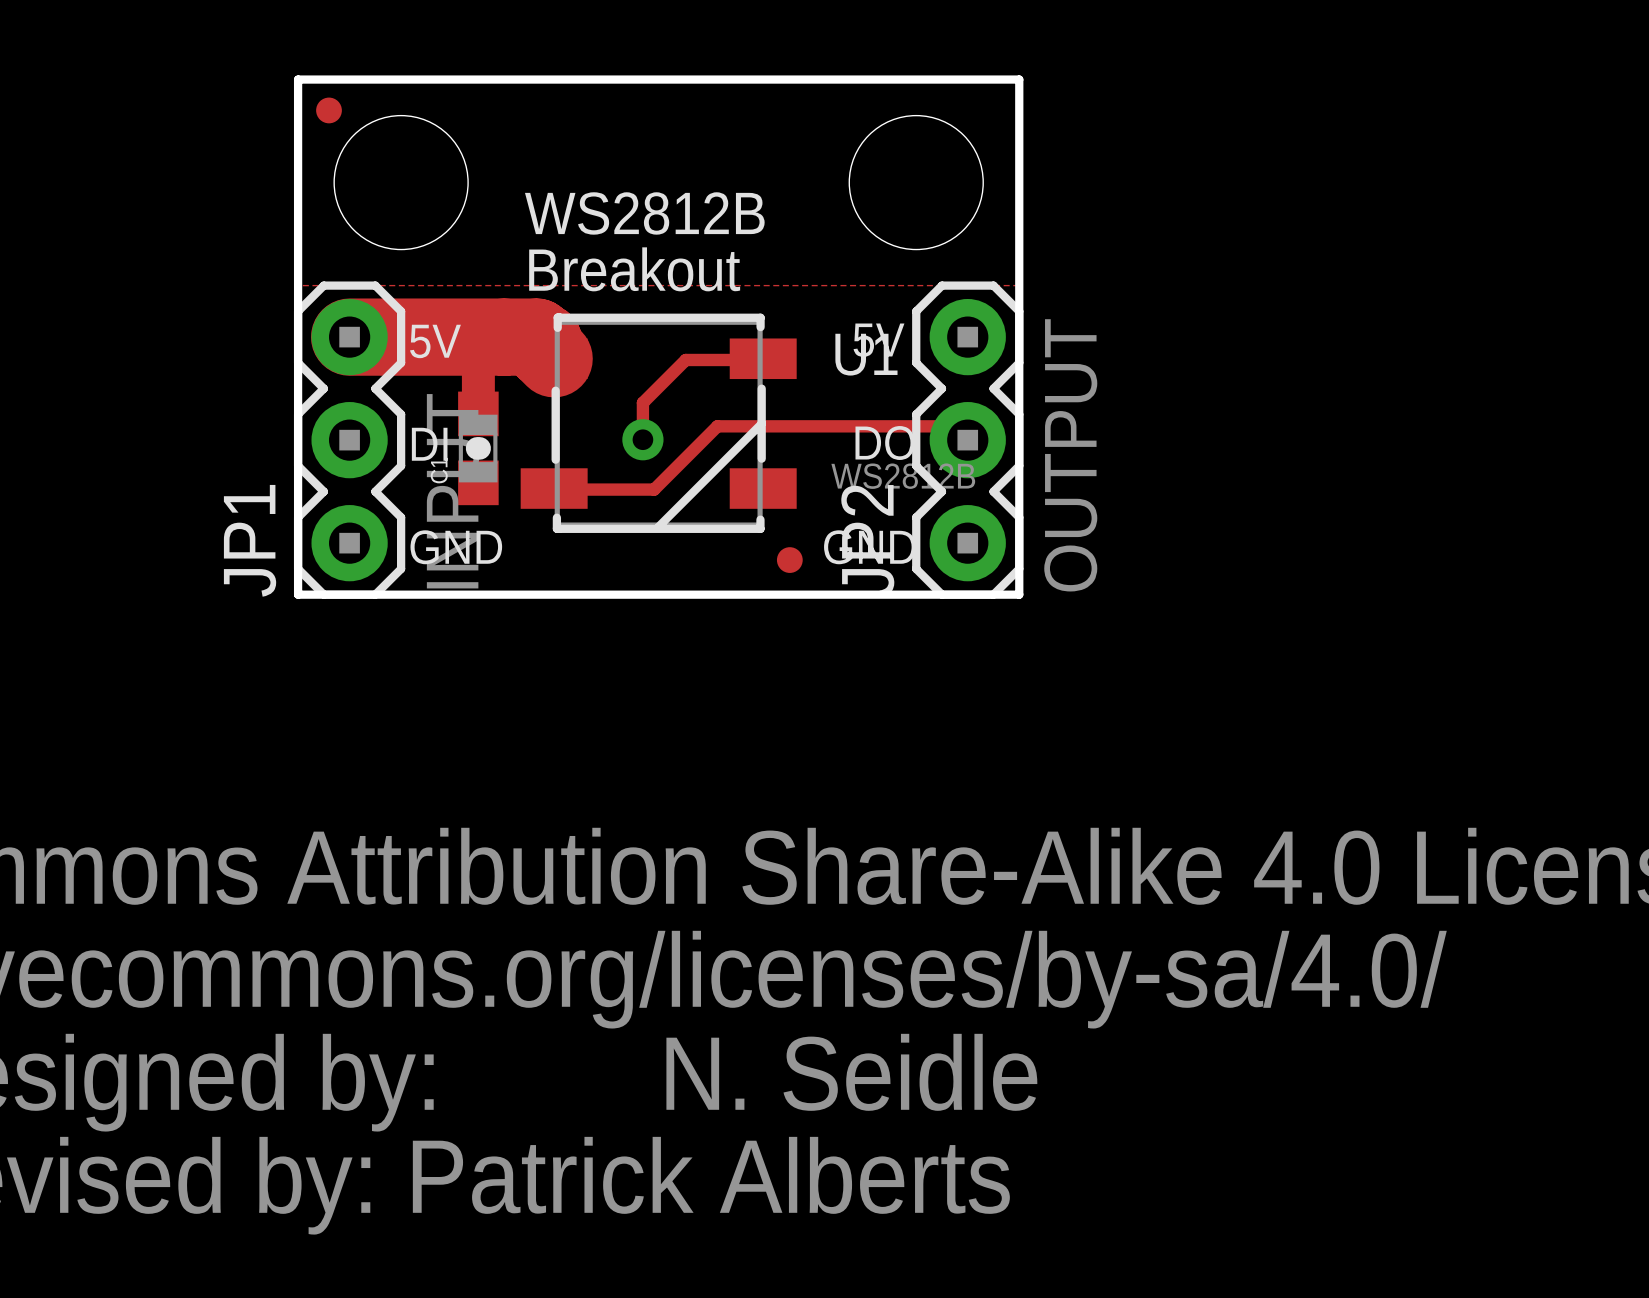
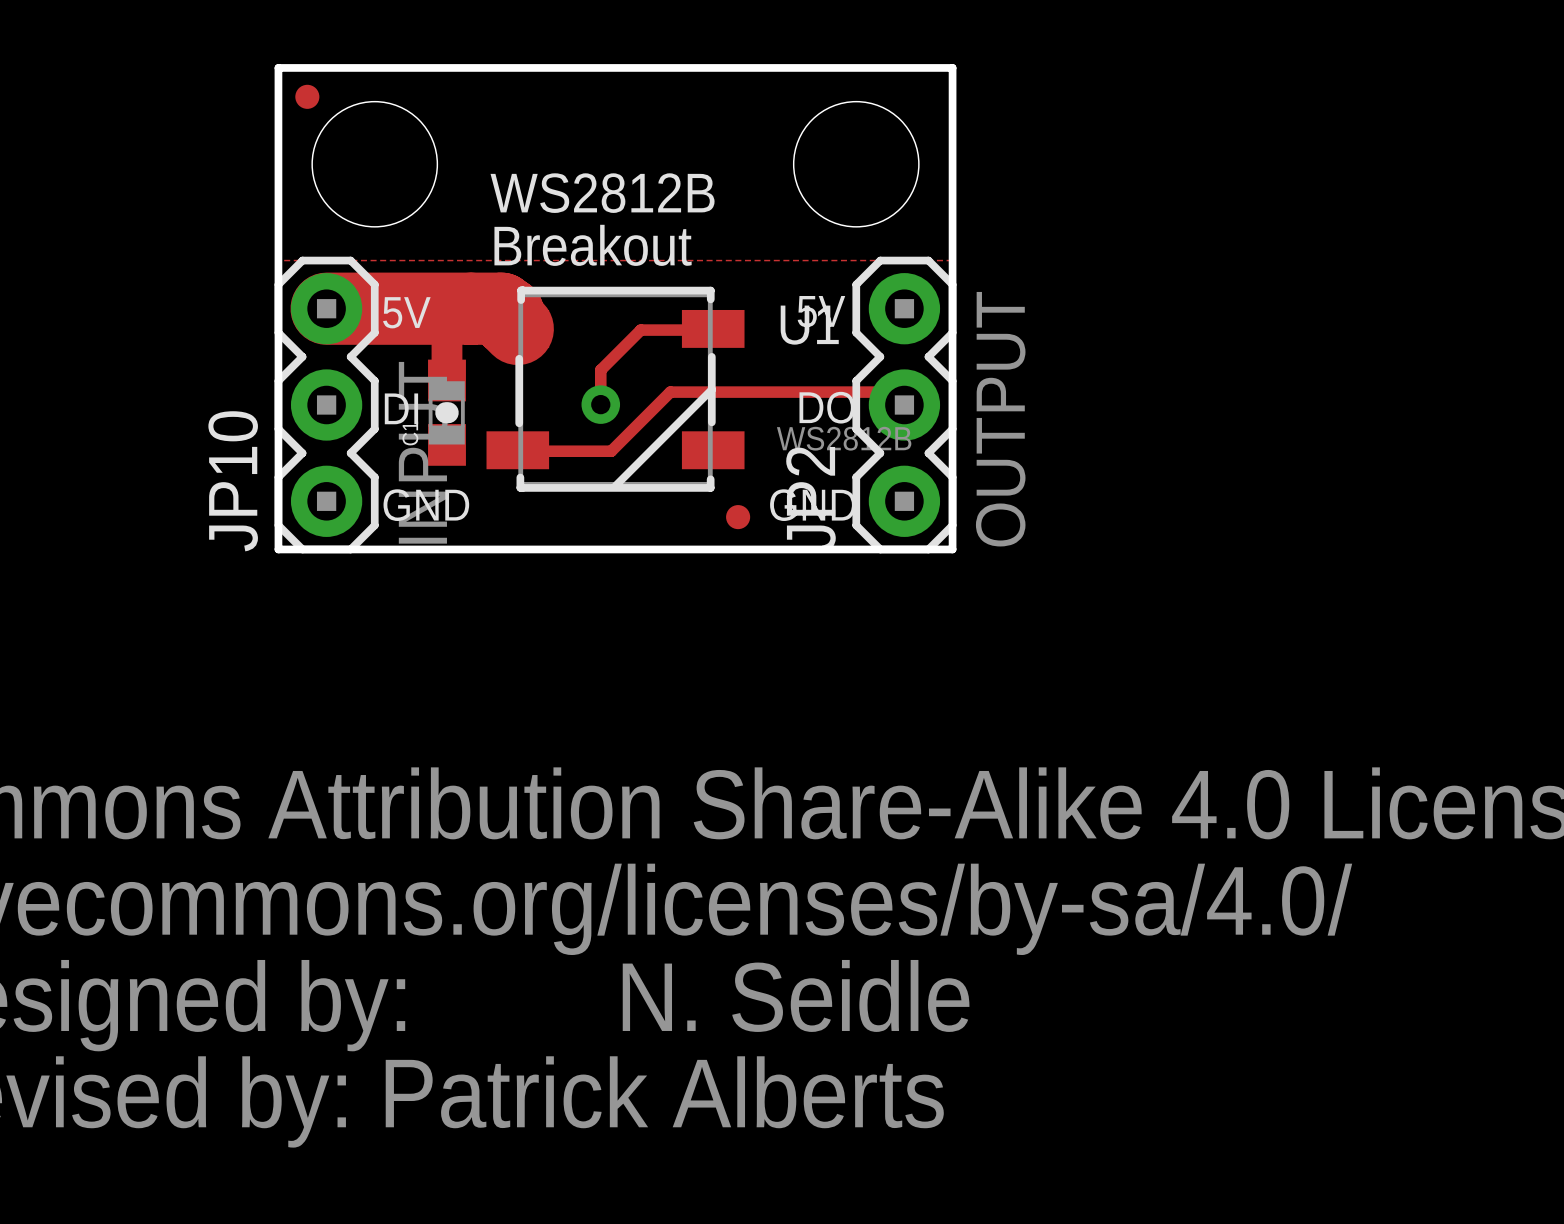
JP1 name: JP1 (250, 540) -> JP10 (233, 481)

